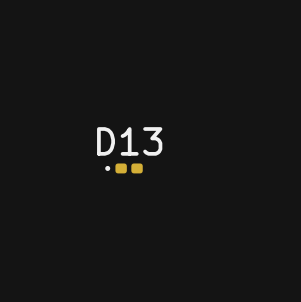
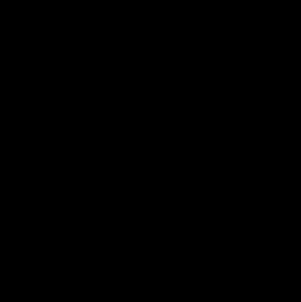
D13: (123, 168) -> none

